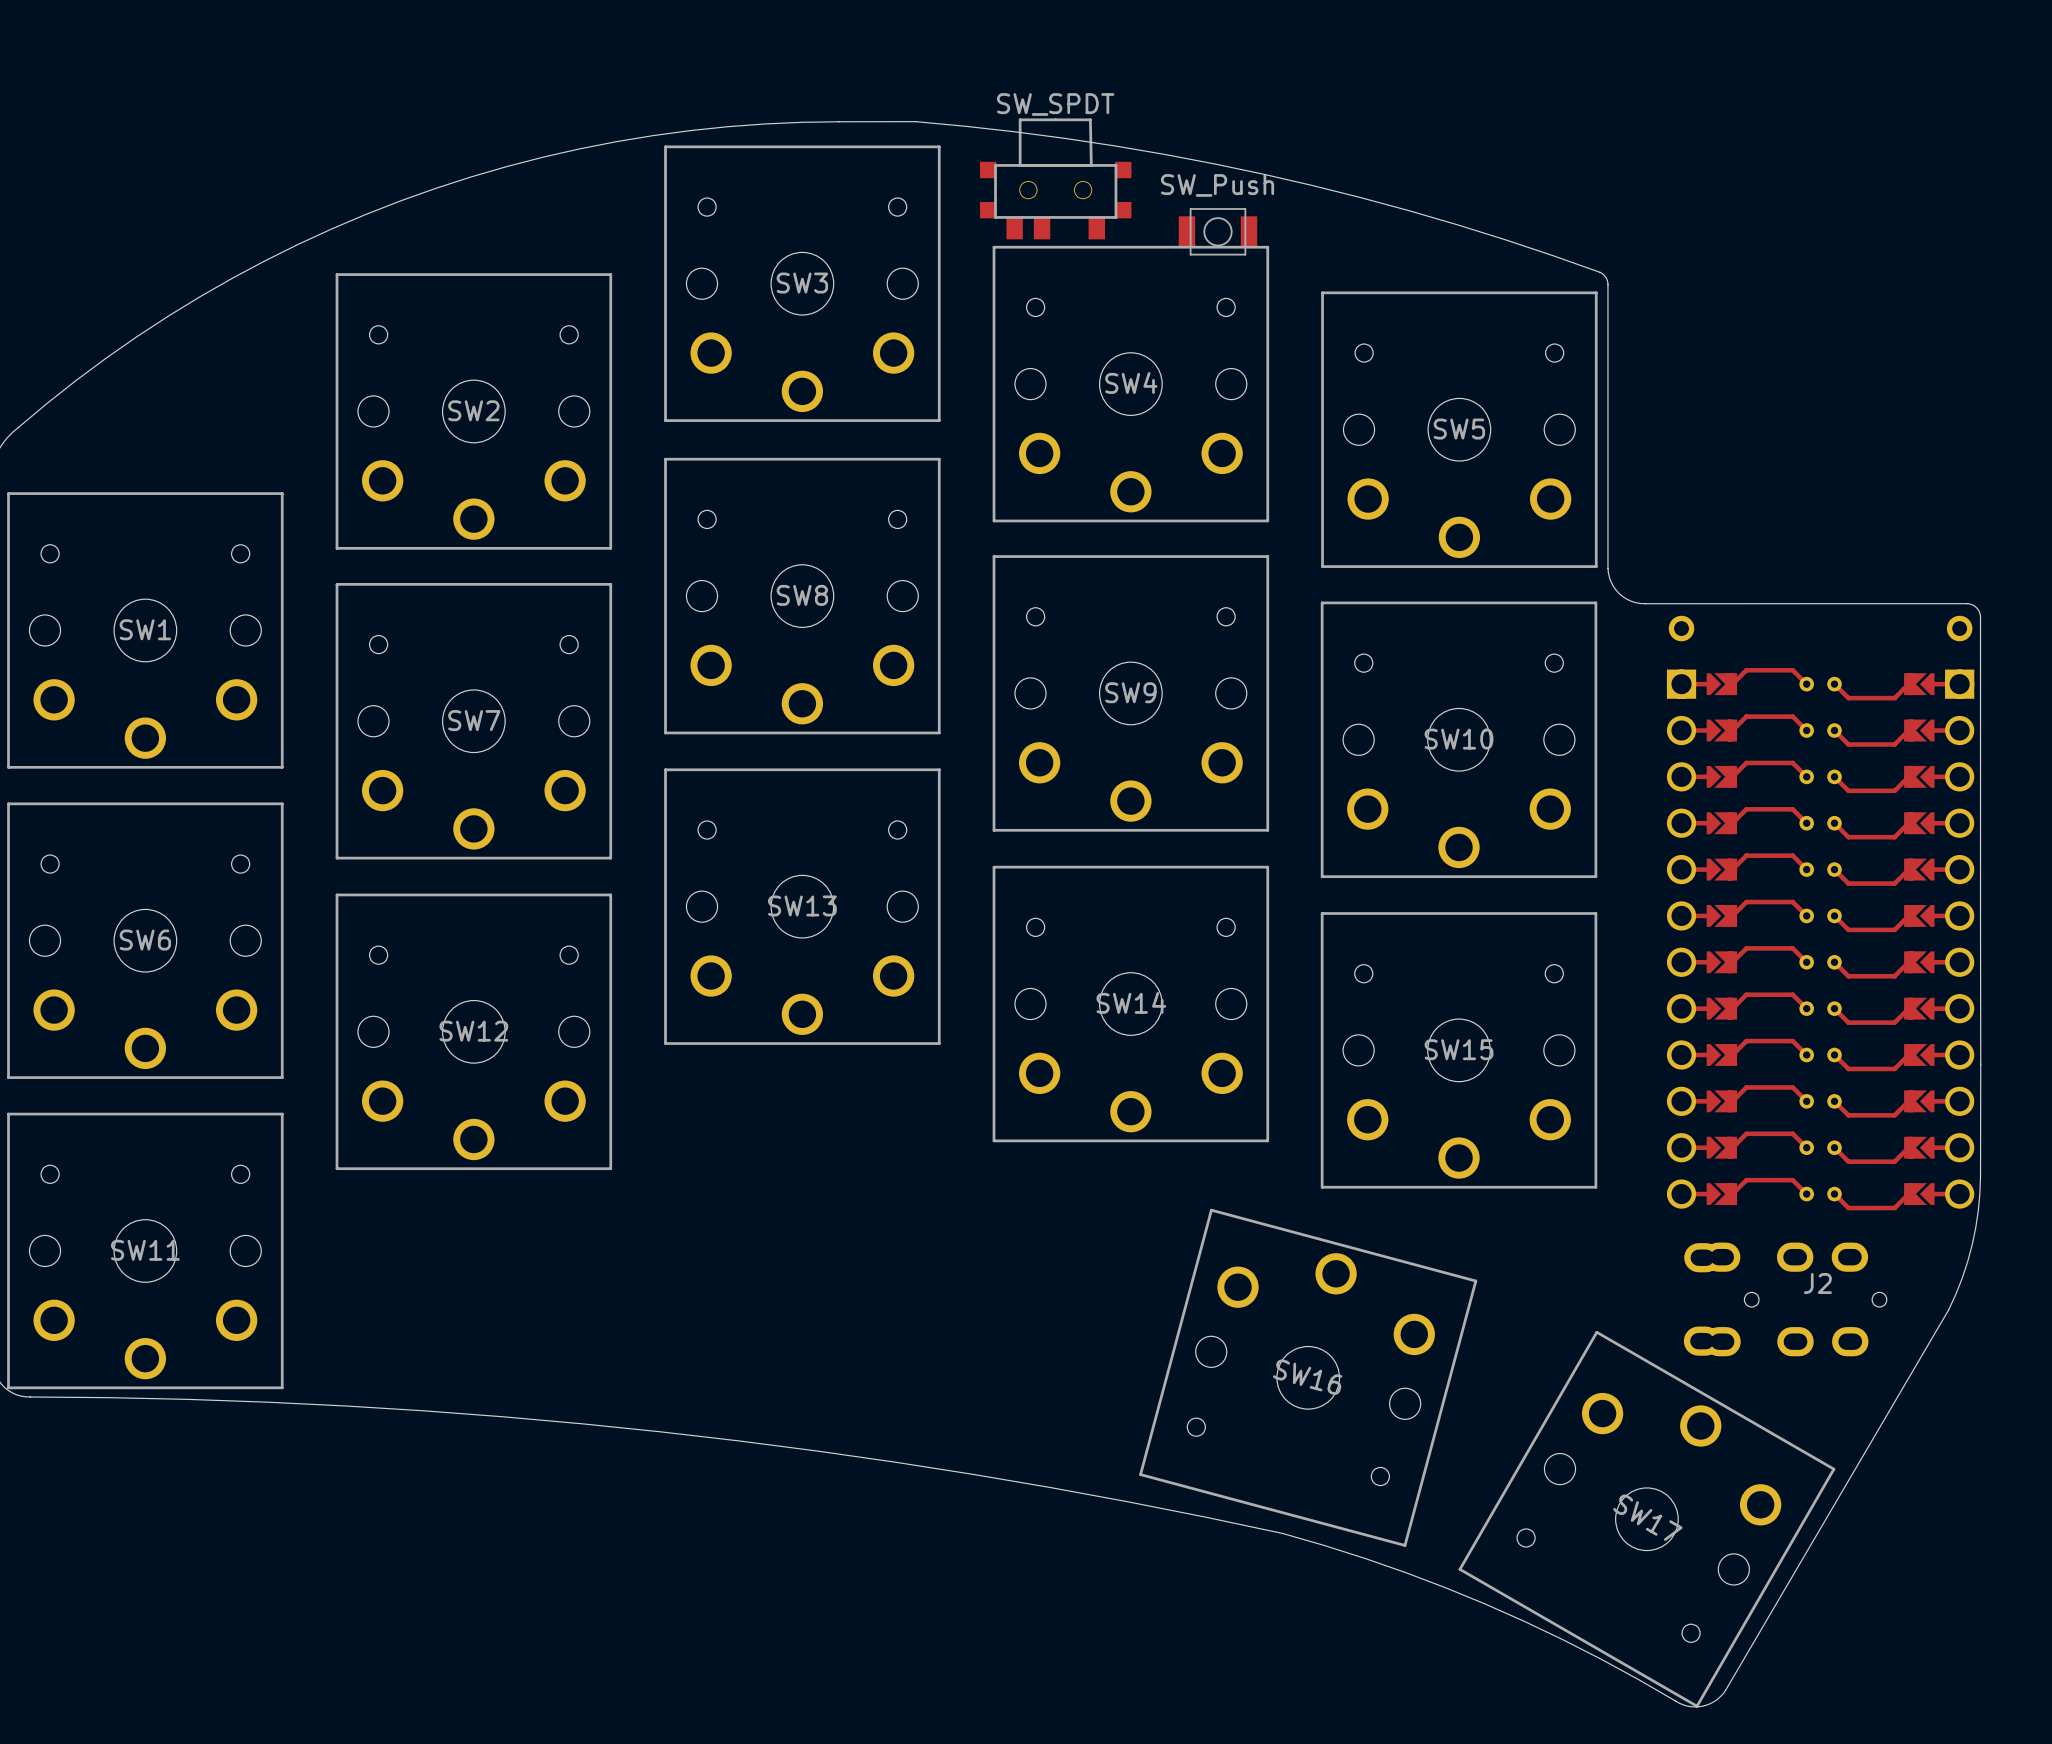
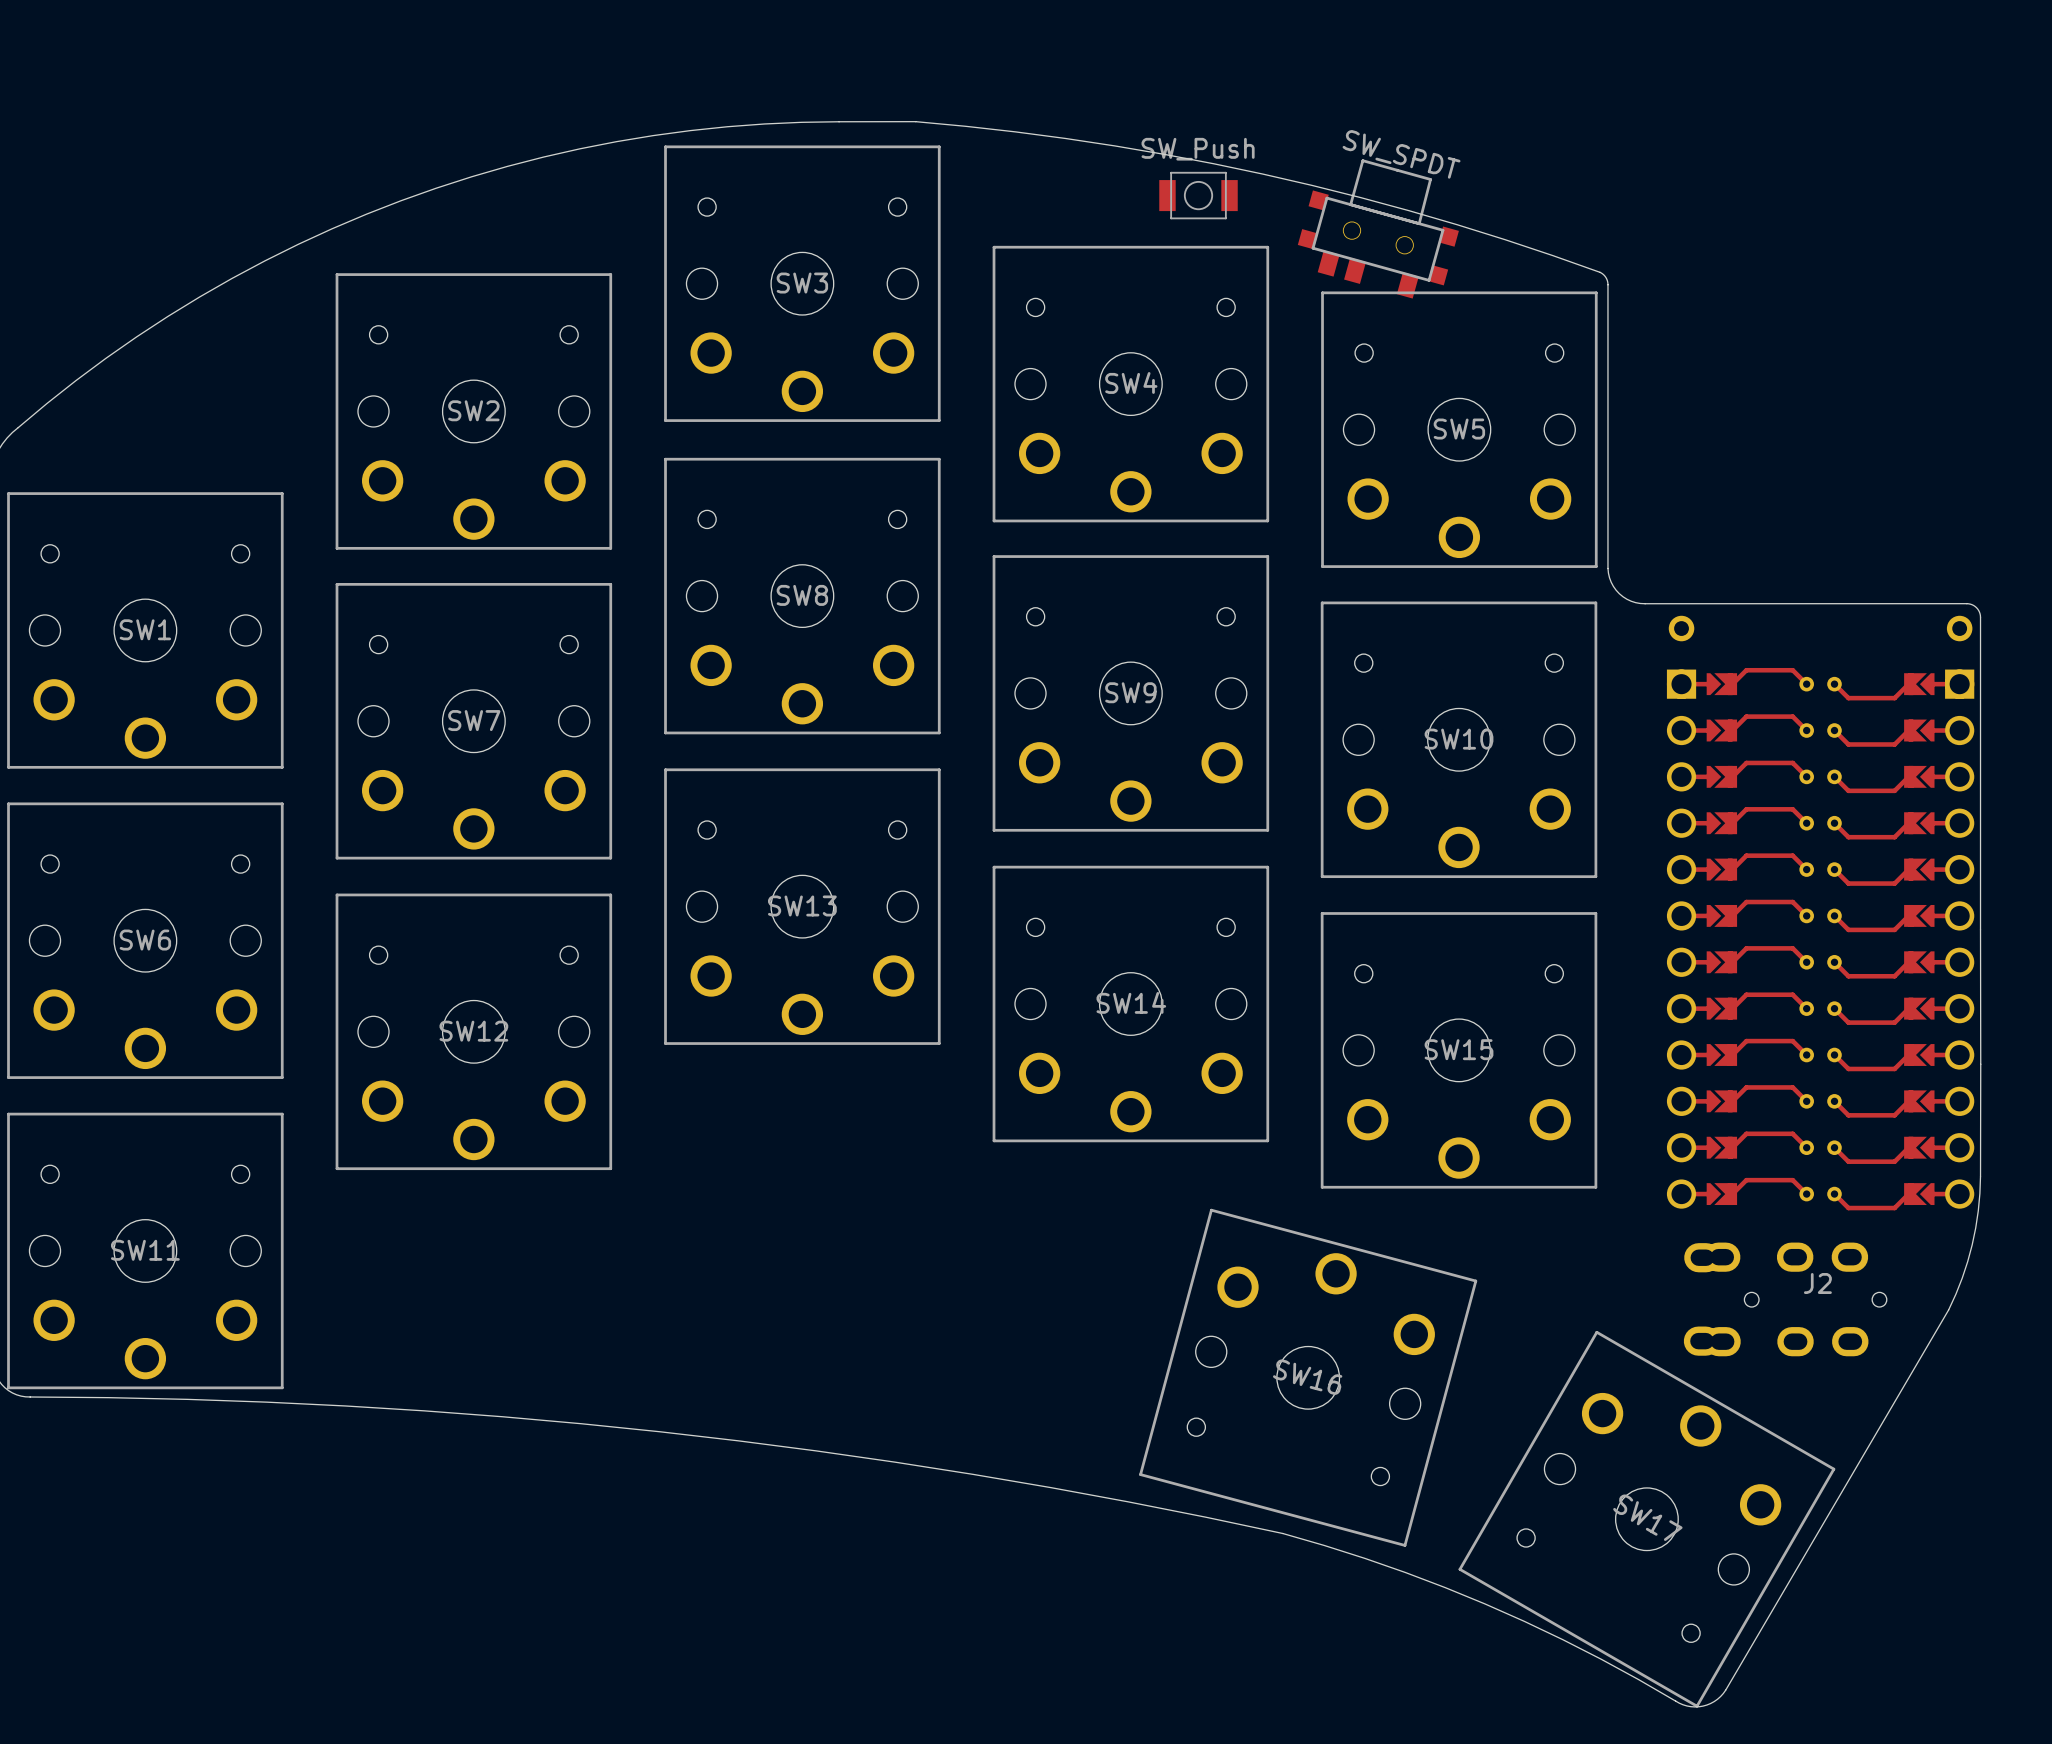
part: SW_SPDT (1055, 178) -> none
part: none -> SW_SPDT (1378, 228)
part position: (1217, 231) -> (1198, 195)

